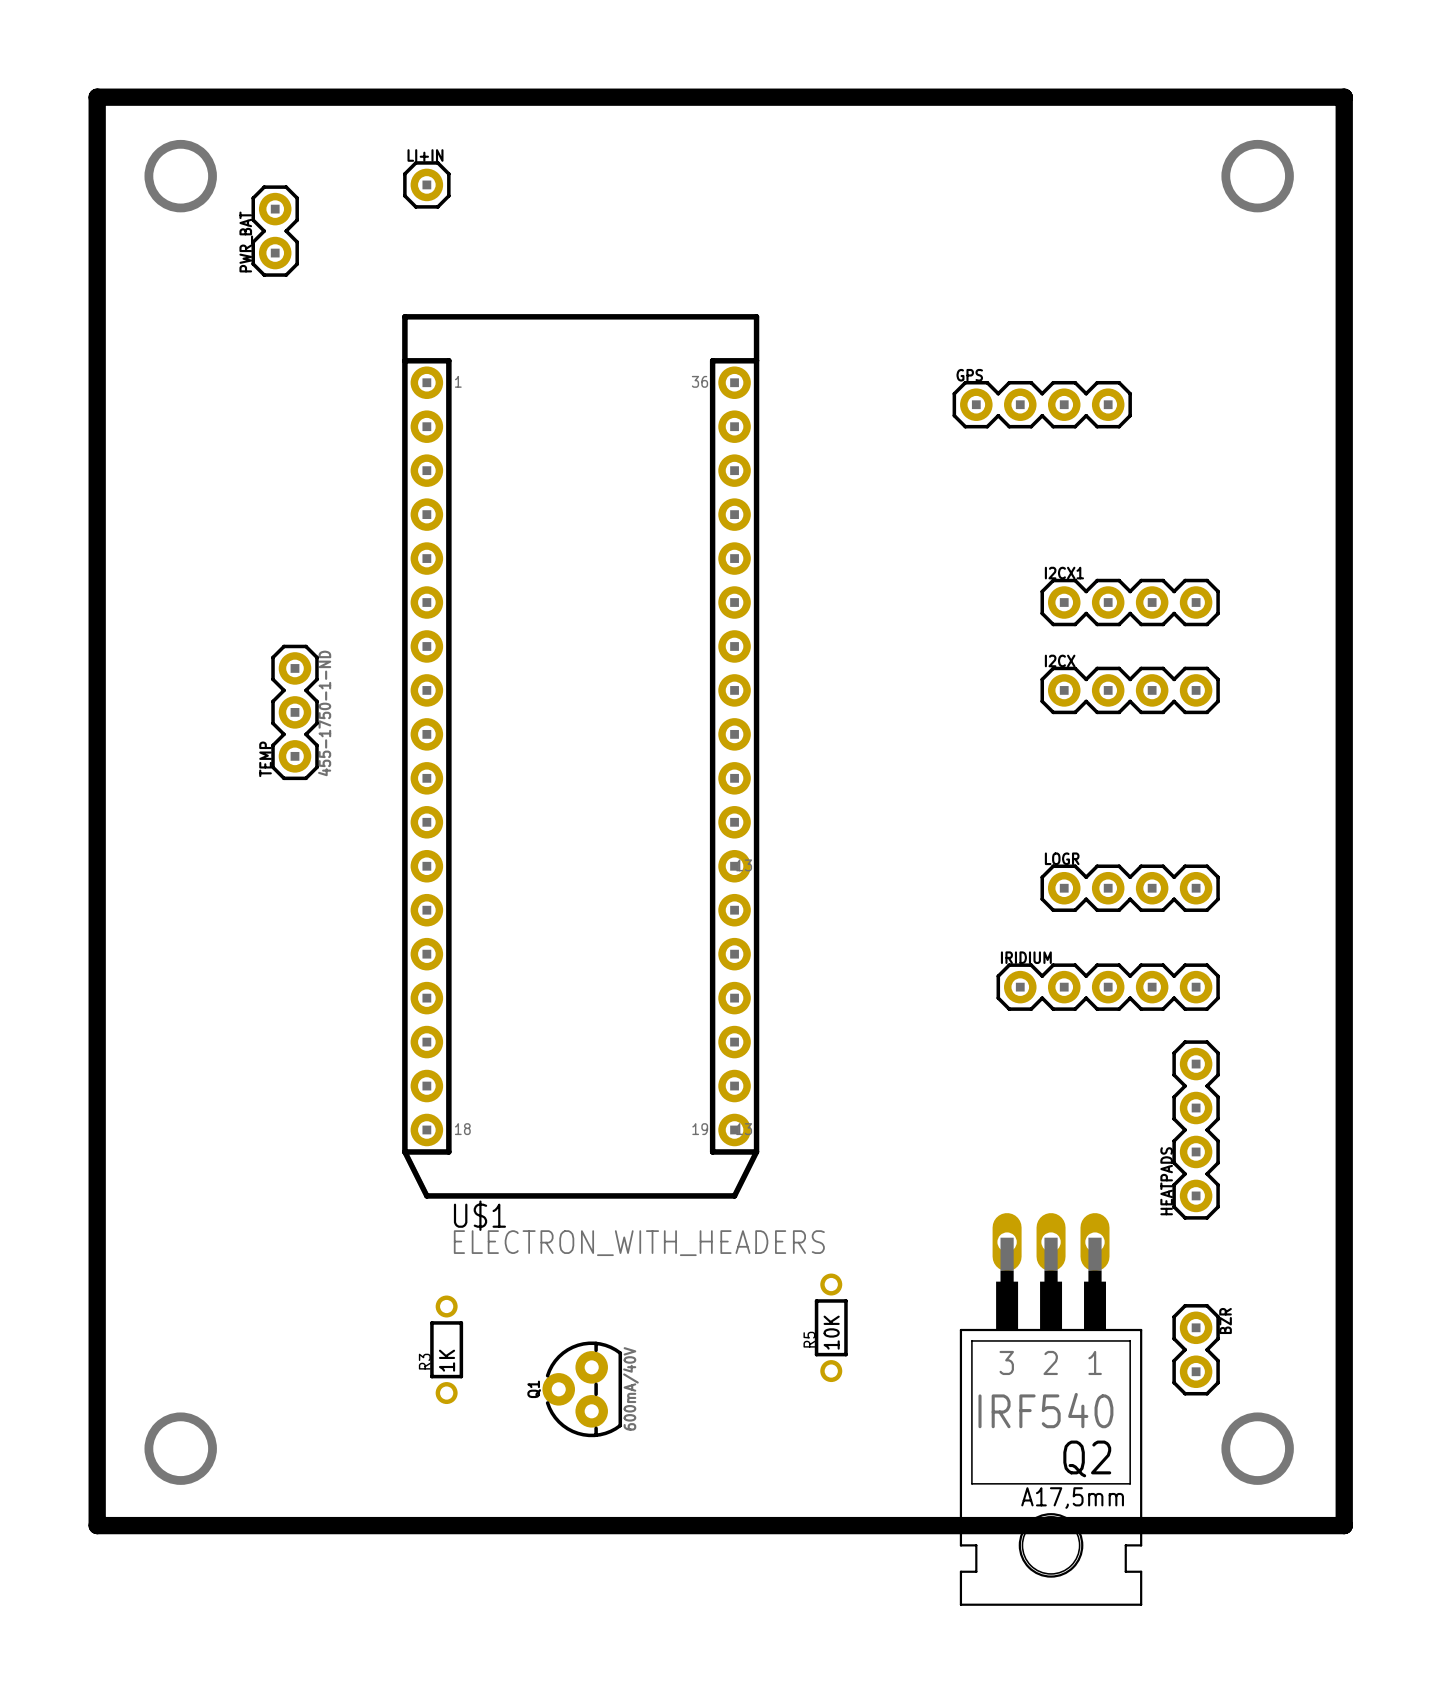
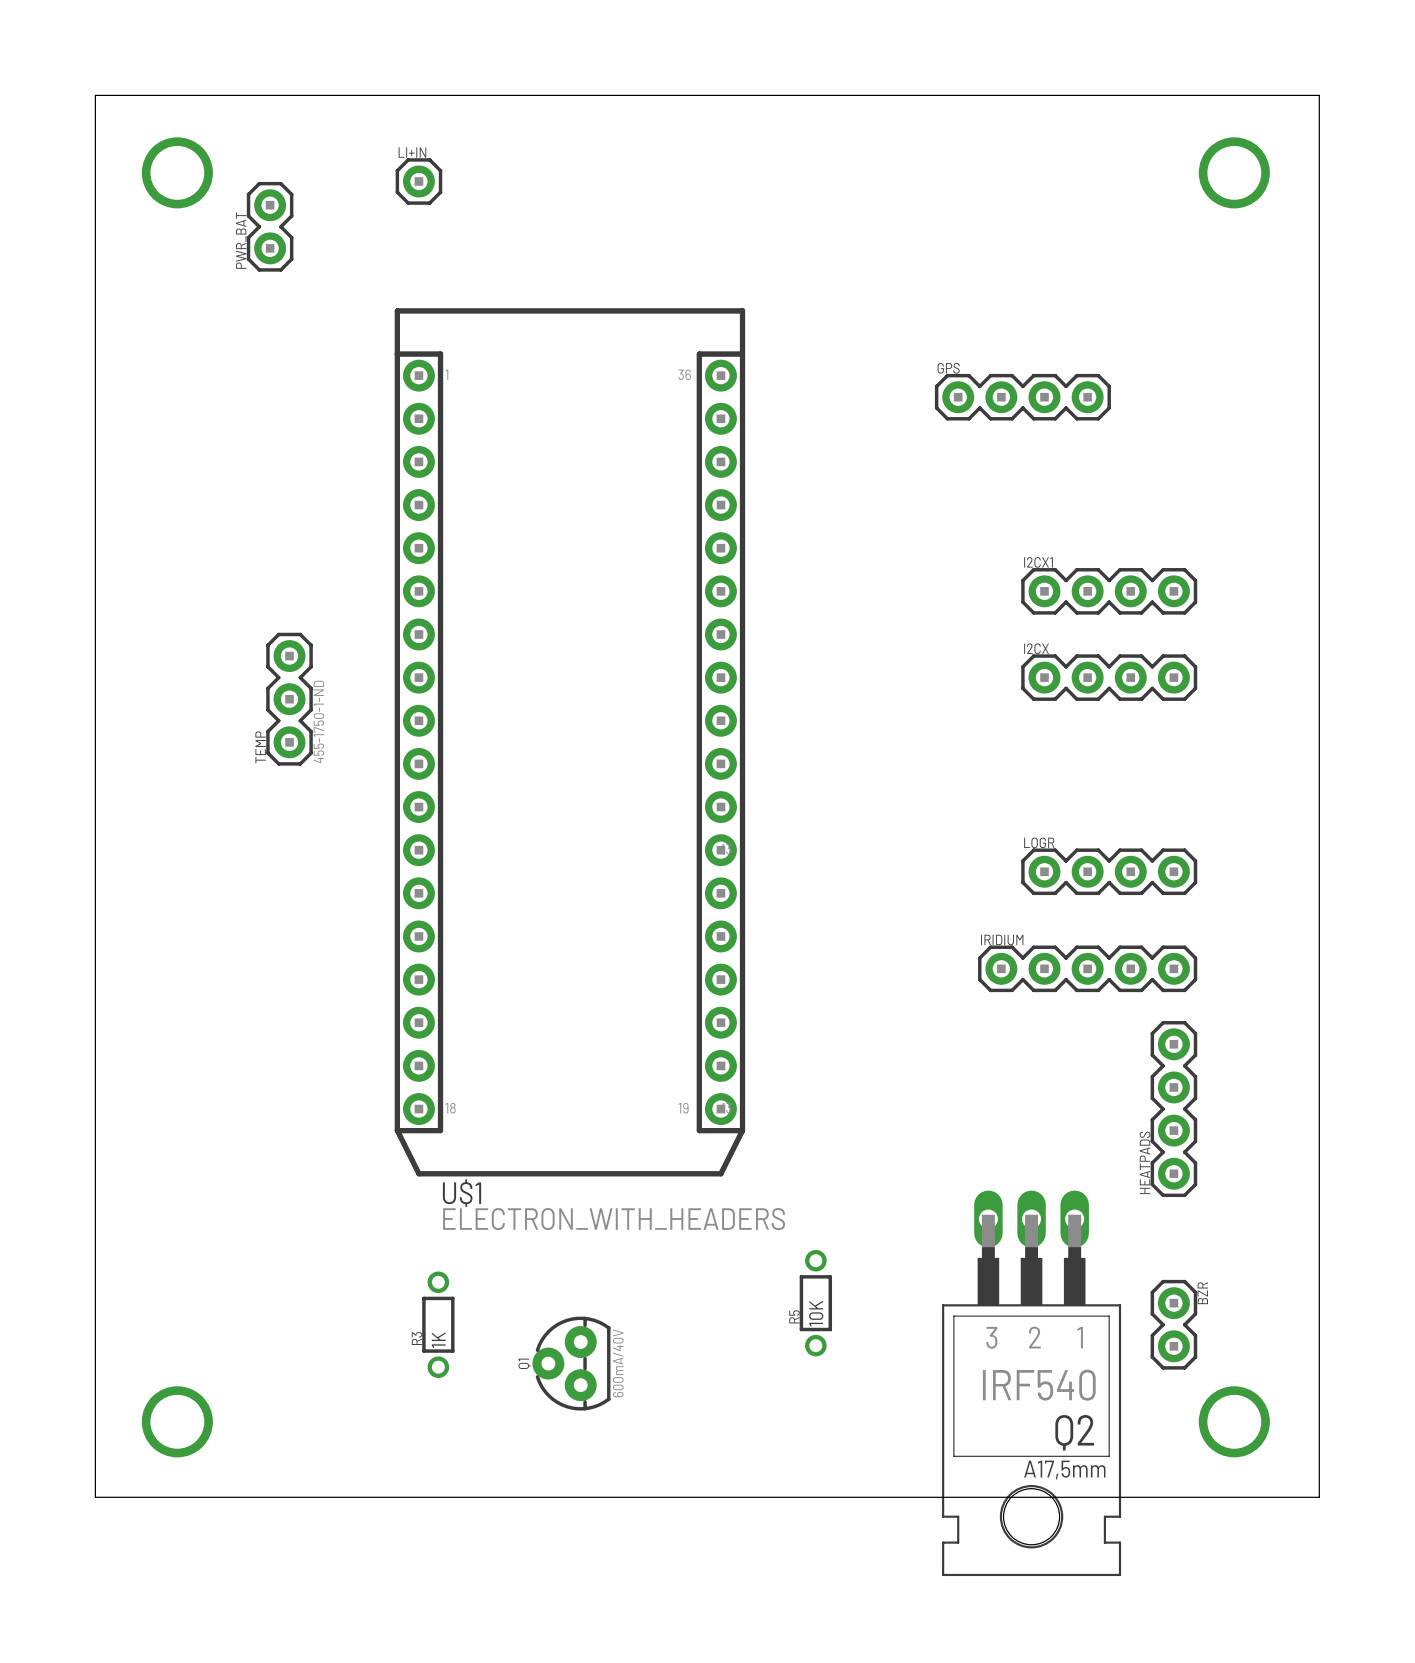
board edge width: thick (97, 97) (1344, 97) (1344, 1525) (97, 1525) (97, 97) -> thin (95, 95) (1319, 95) (1319, 1497) (95, 1497) (95, 95)

